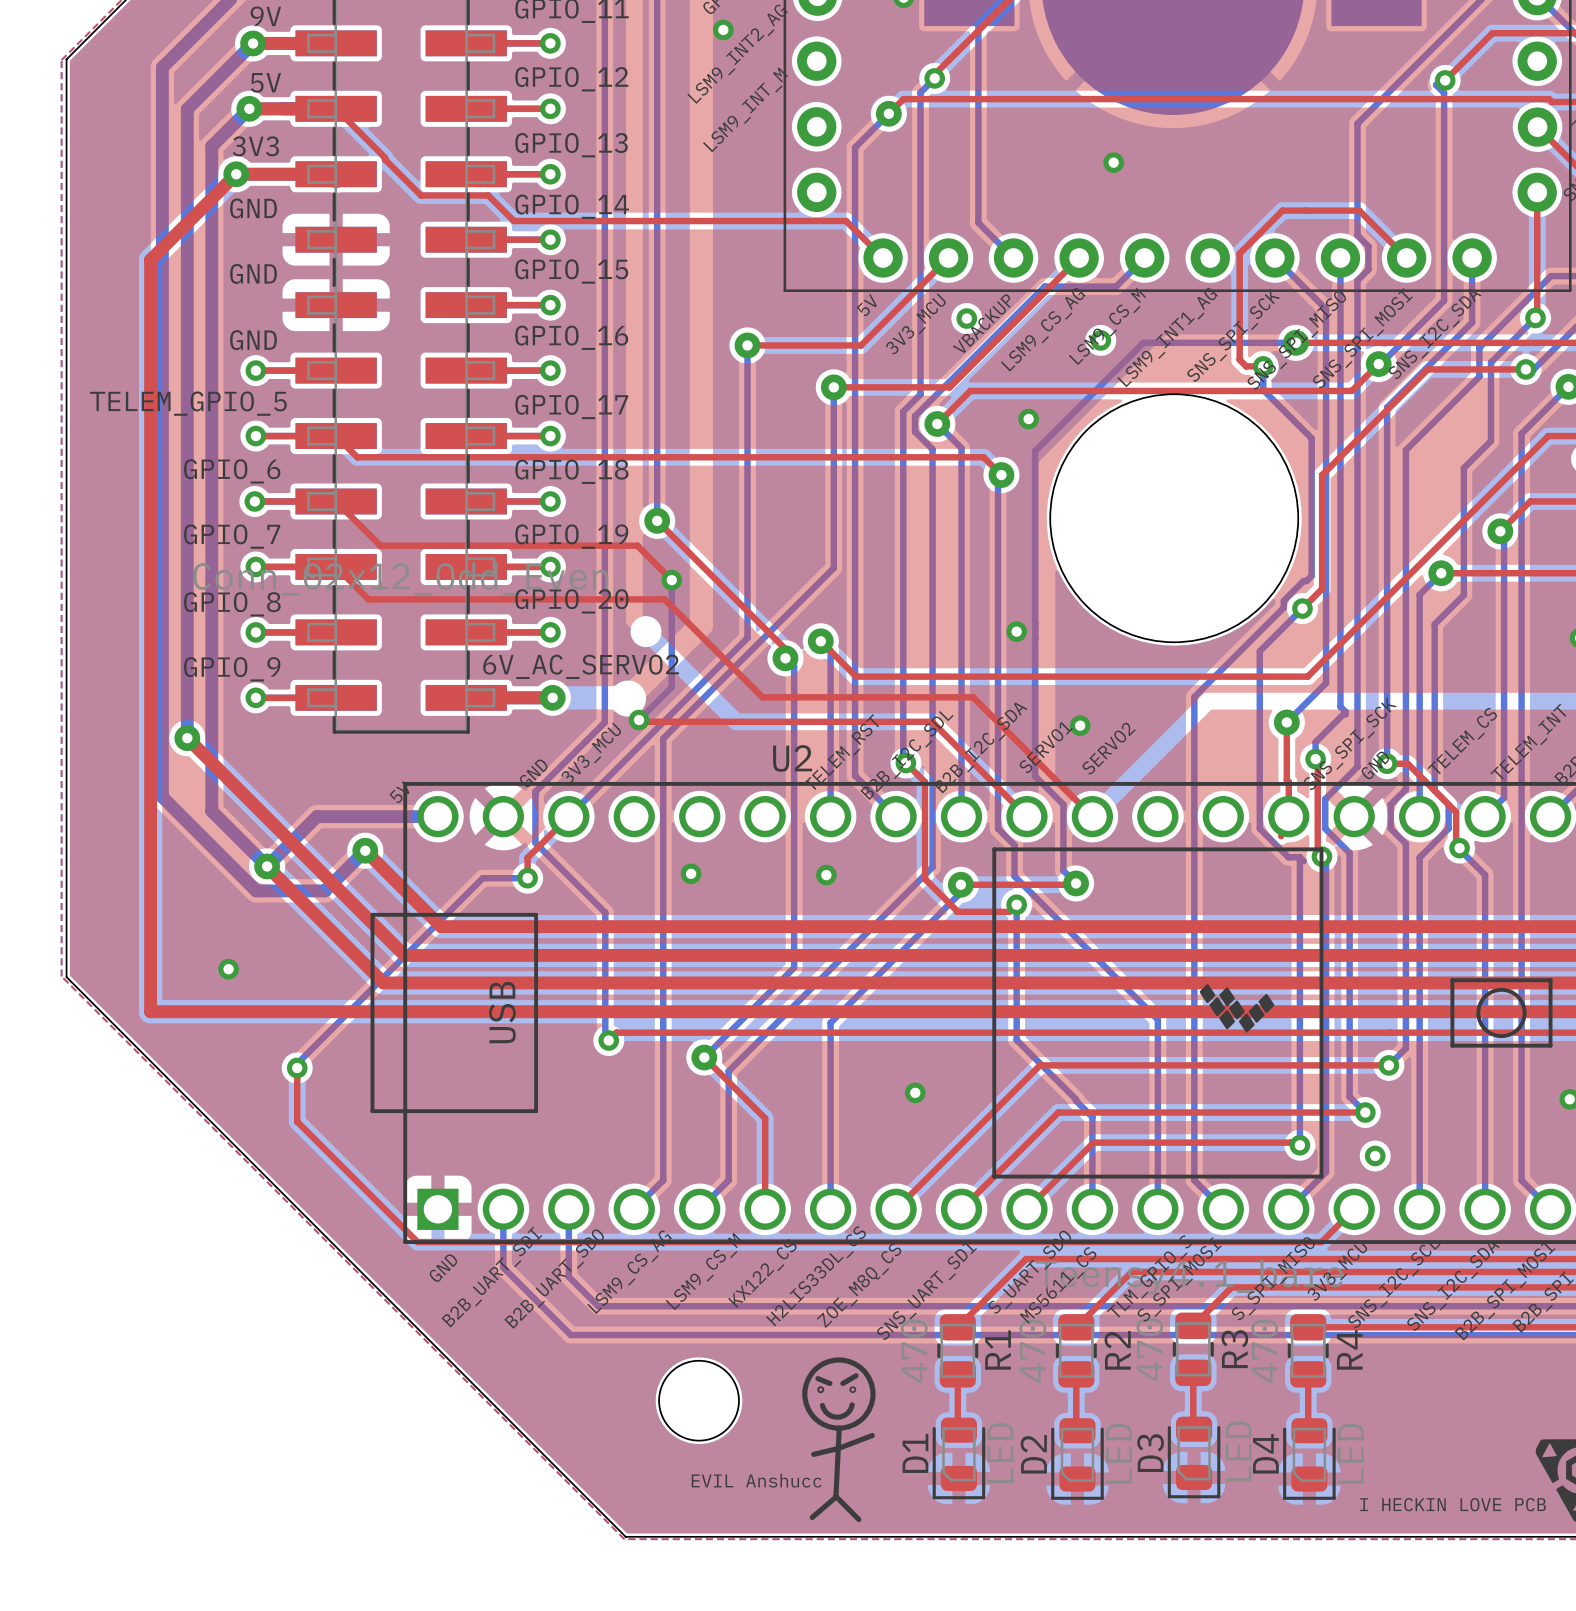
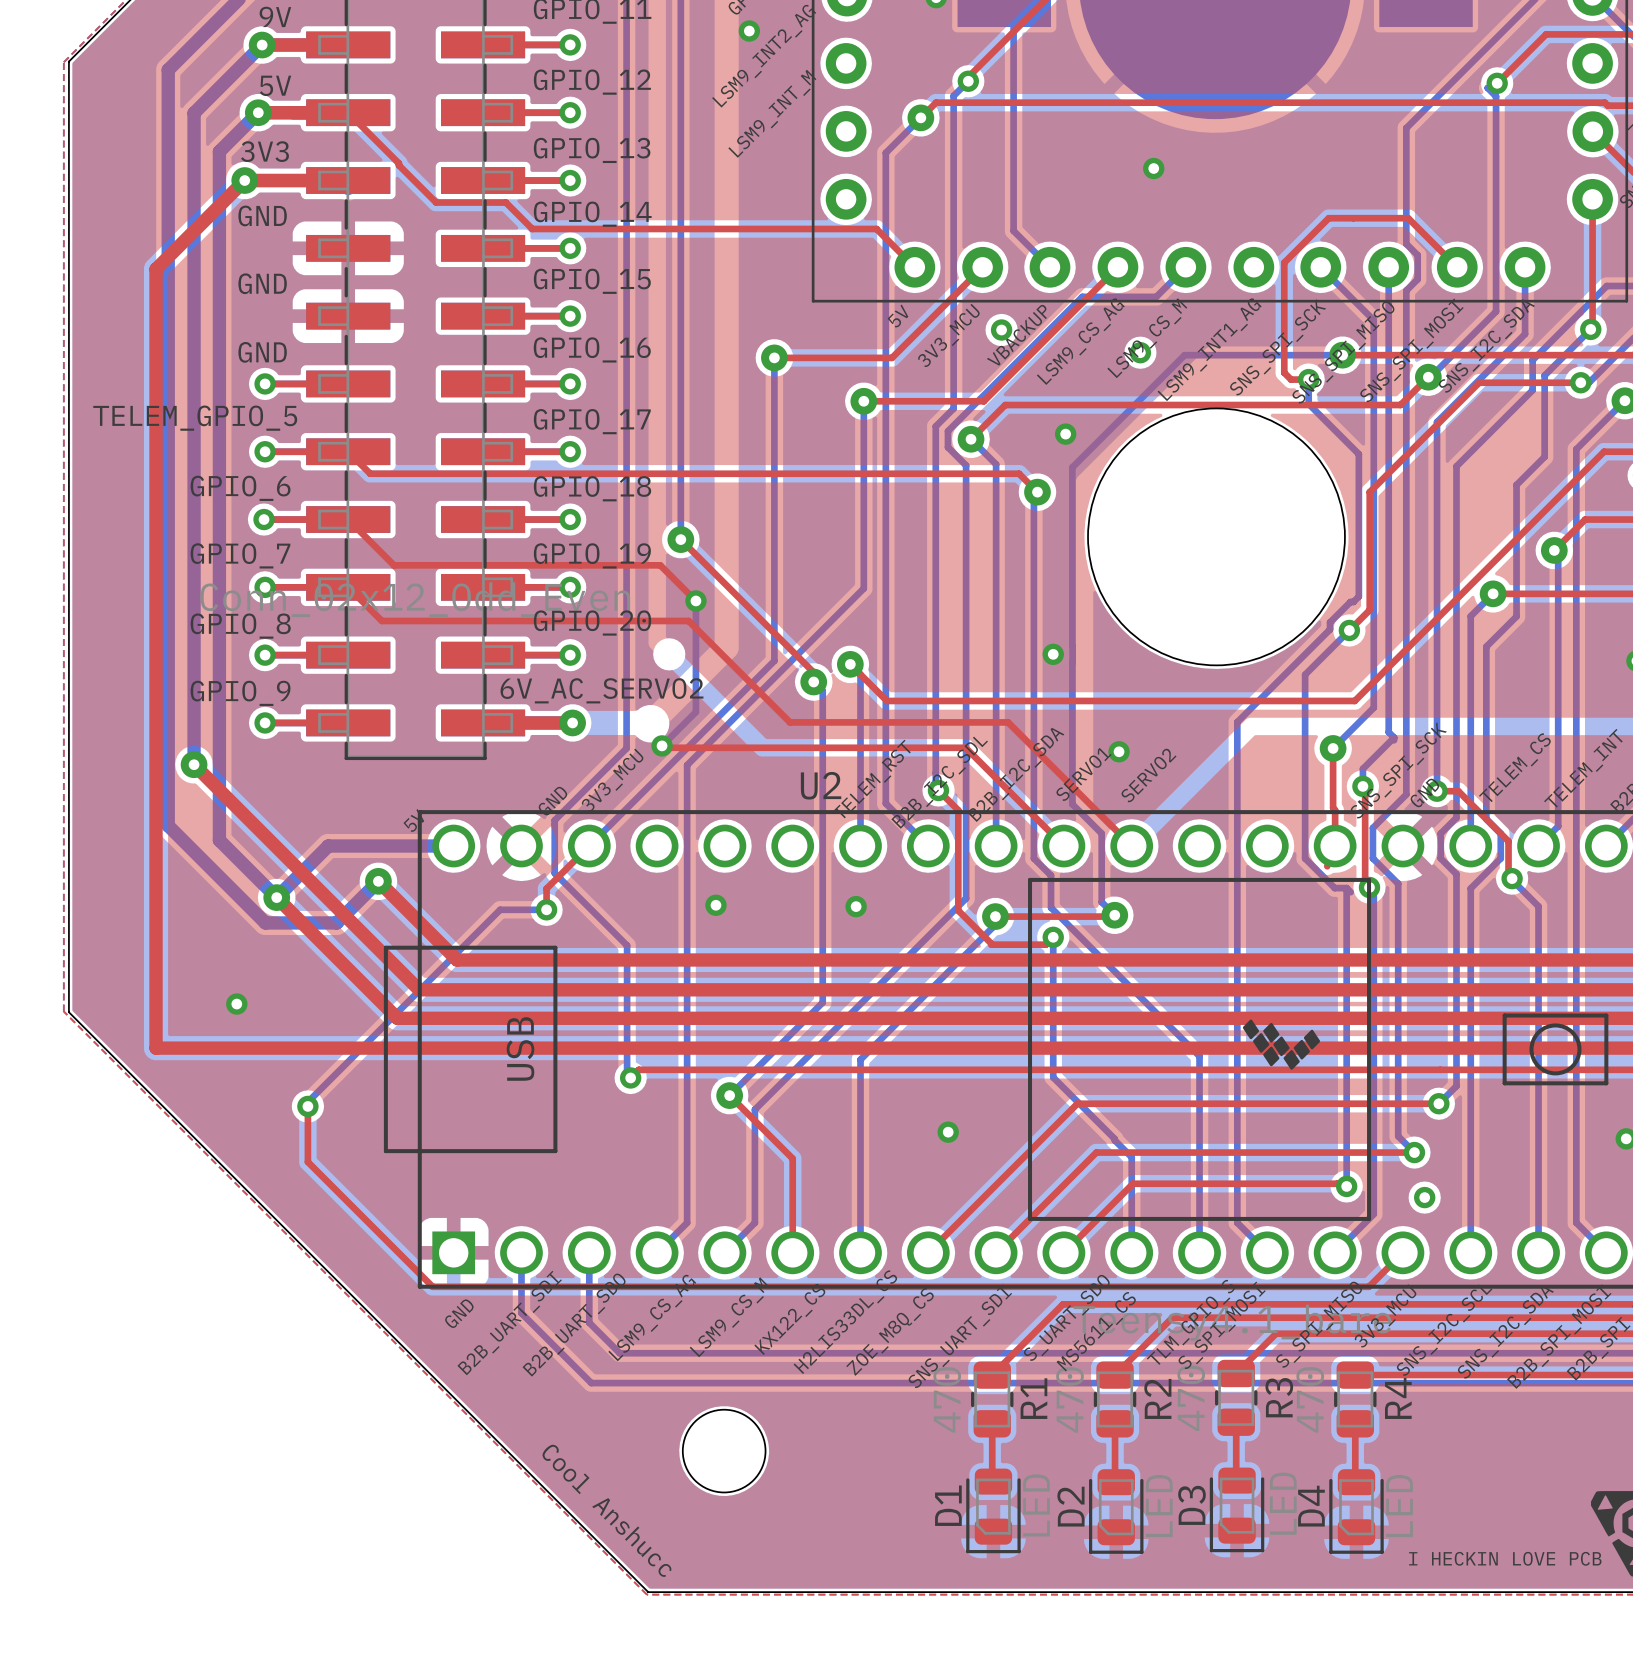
drawing: [802, 1357, 876, 1431] -> none
line: (856, 1375) (842, 1383) -> none
line: (817, 1378) (829, 1383) -> none
line: (852, 1404) (847, 1413) (837, 1417) (827, 1413) (822, 1405) -> none
line: (839, 1428) (835, 1497) (812, 1517) -> none
line: (872, 1435) (838, 1448) (813, 1454) -> none
text: none -> Cool Anshucc (606, 1510)
text: EVIL Anshucc (756, 1480) -> none
line: (835, 1496) (858, 1519) -> none

